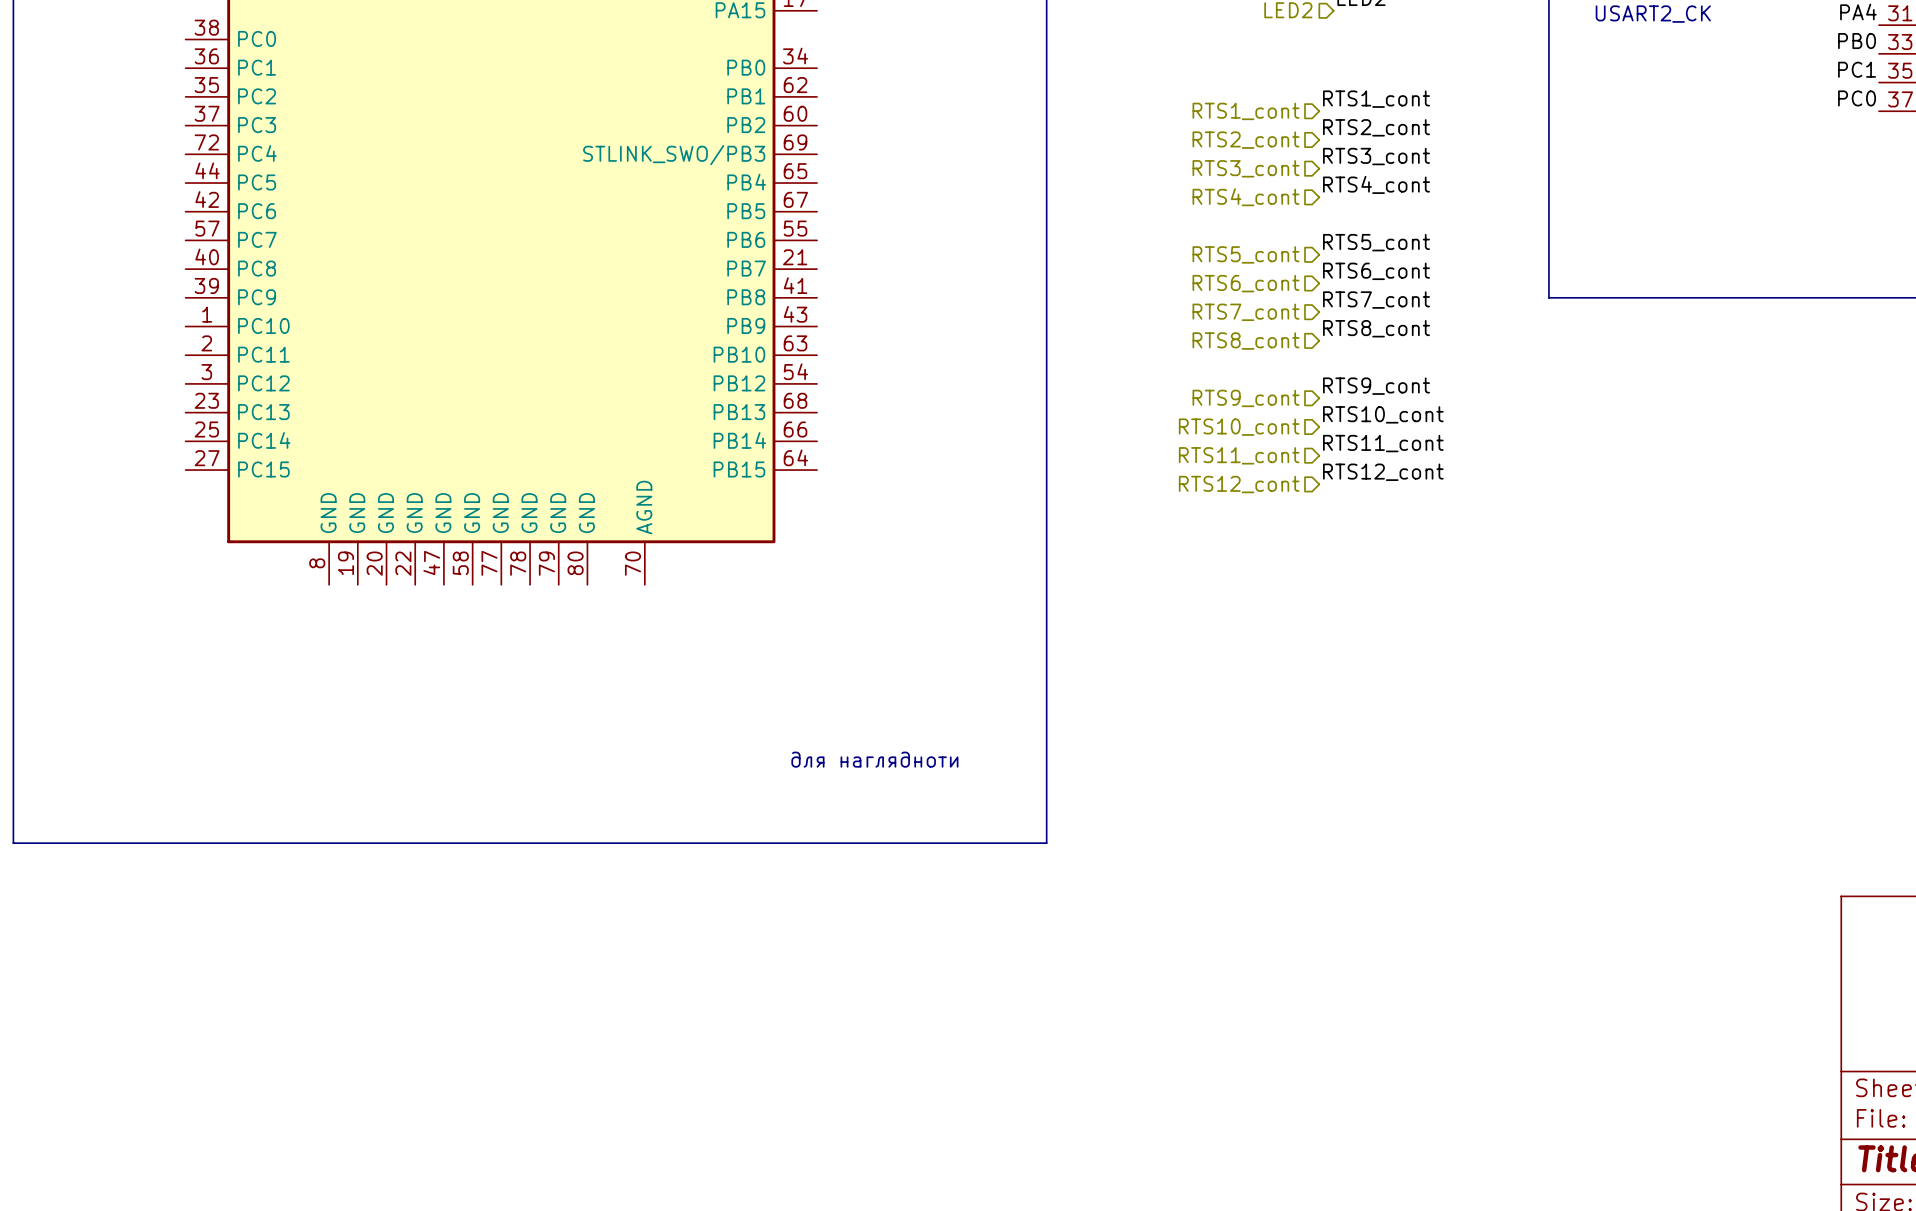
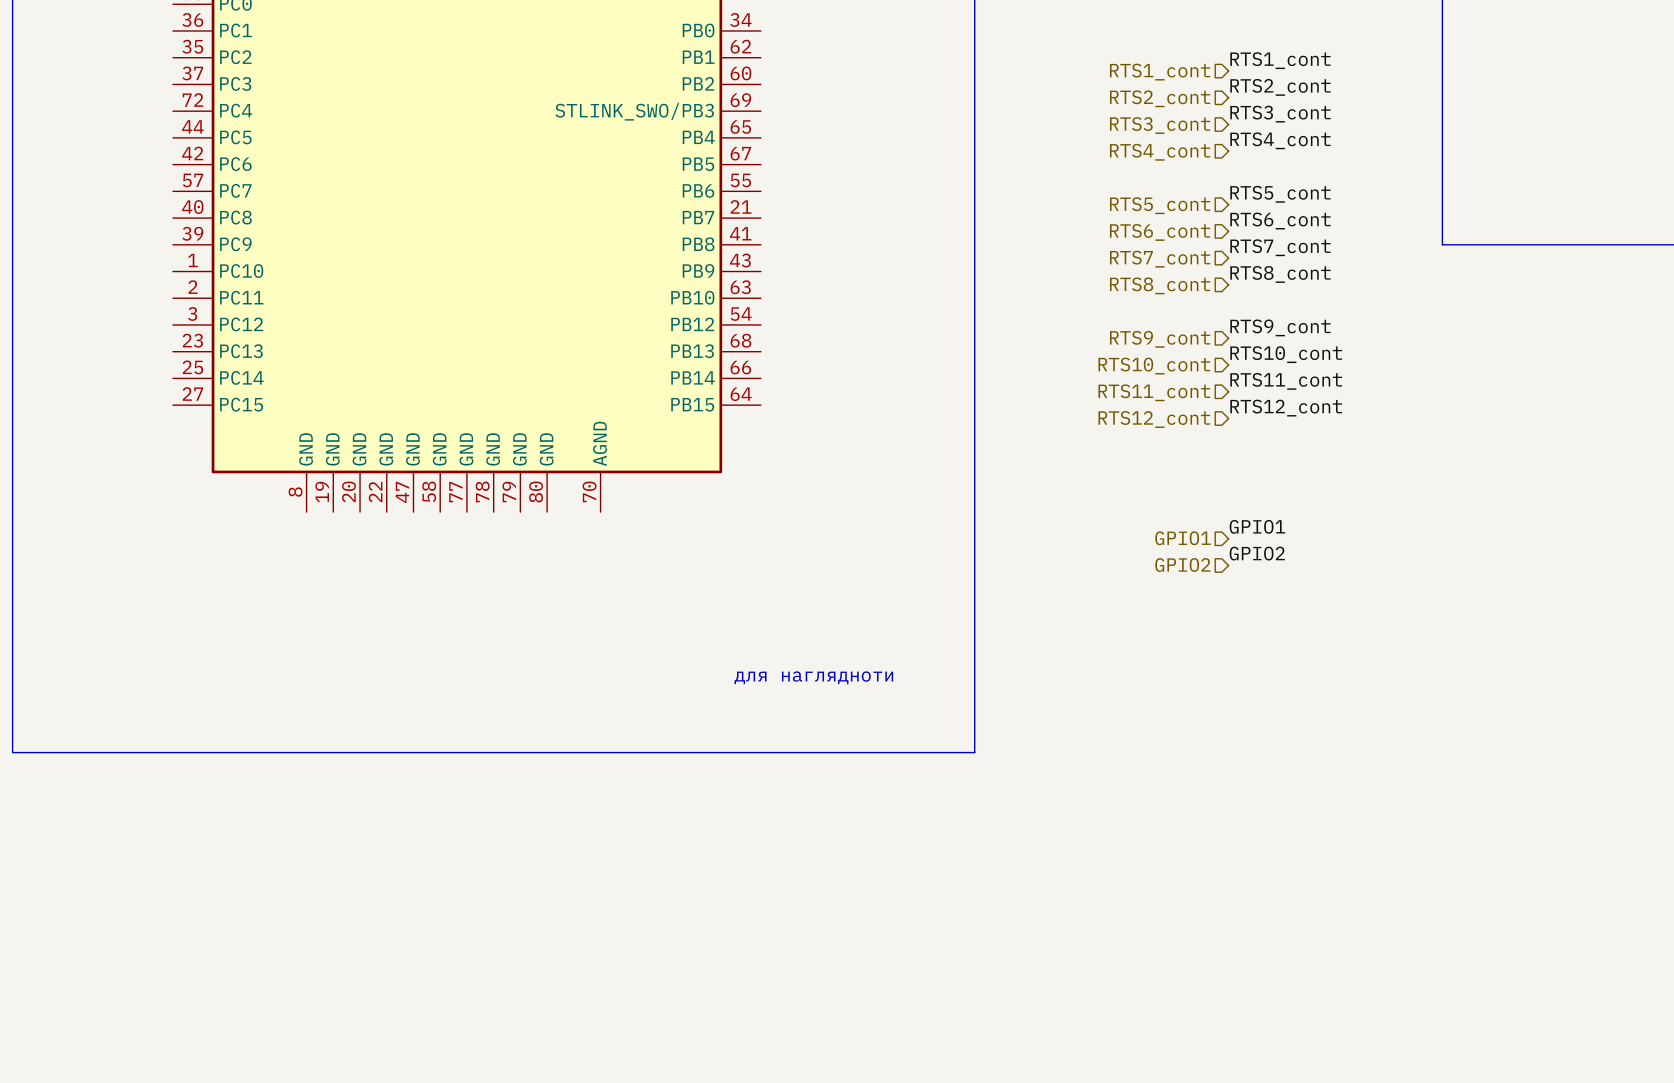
label: none -> GPIO1 (1257, 526)
hierarchical label: none -> GPIO1 (1183, 538)
label: none -> GPIO2 (1257, 553)
hierarchical label: none -> GPIO2 (1182, 565)

